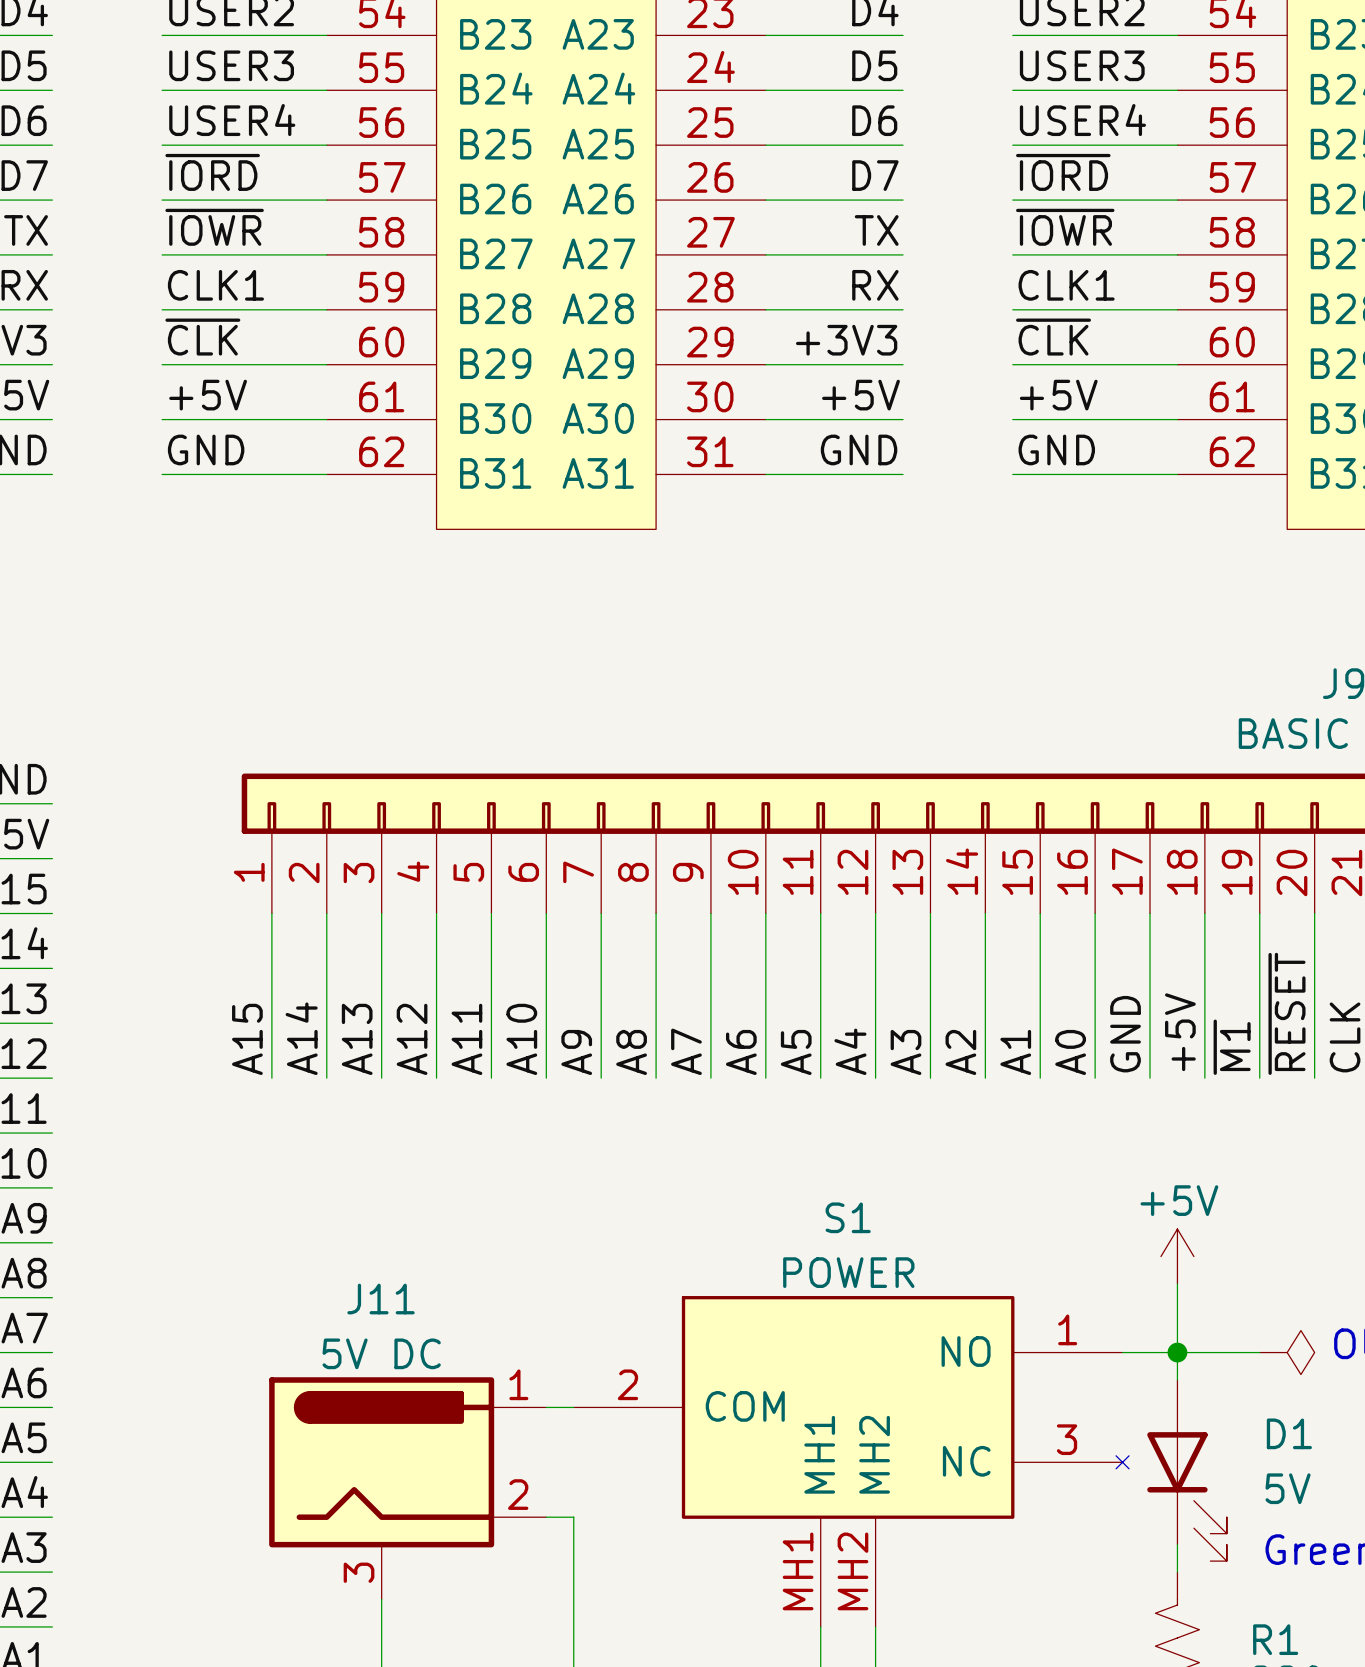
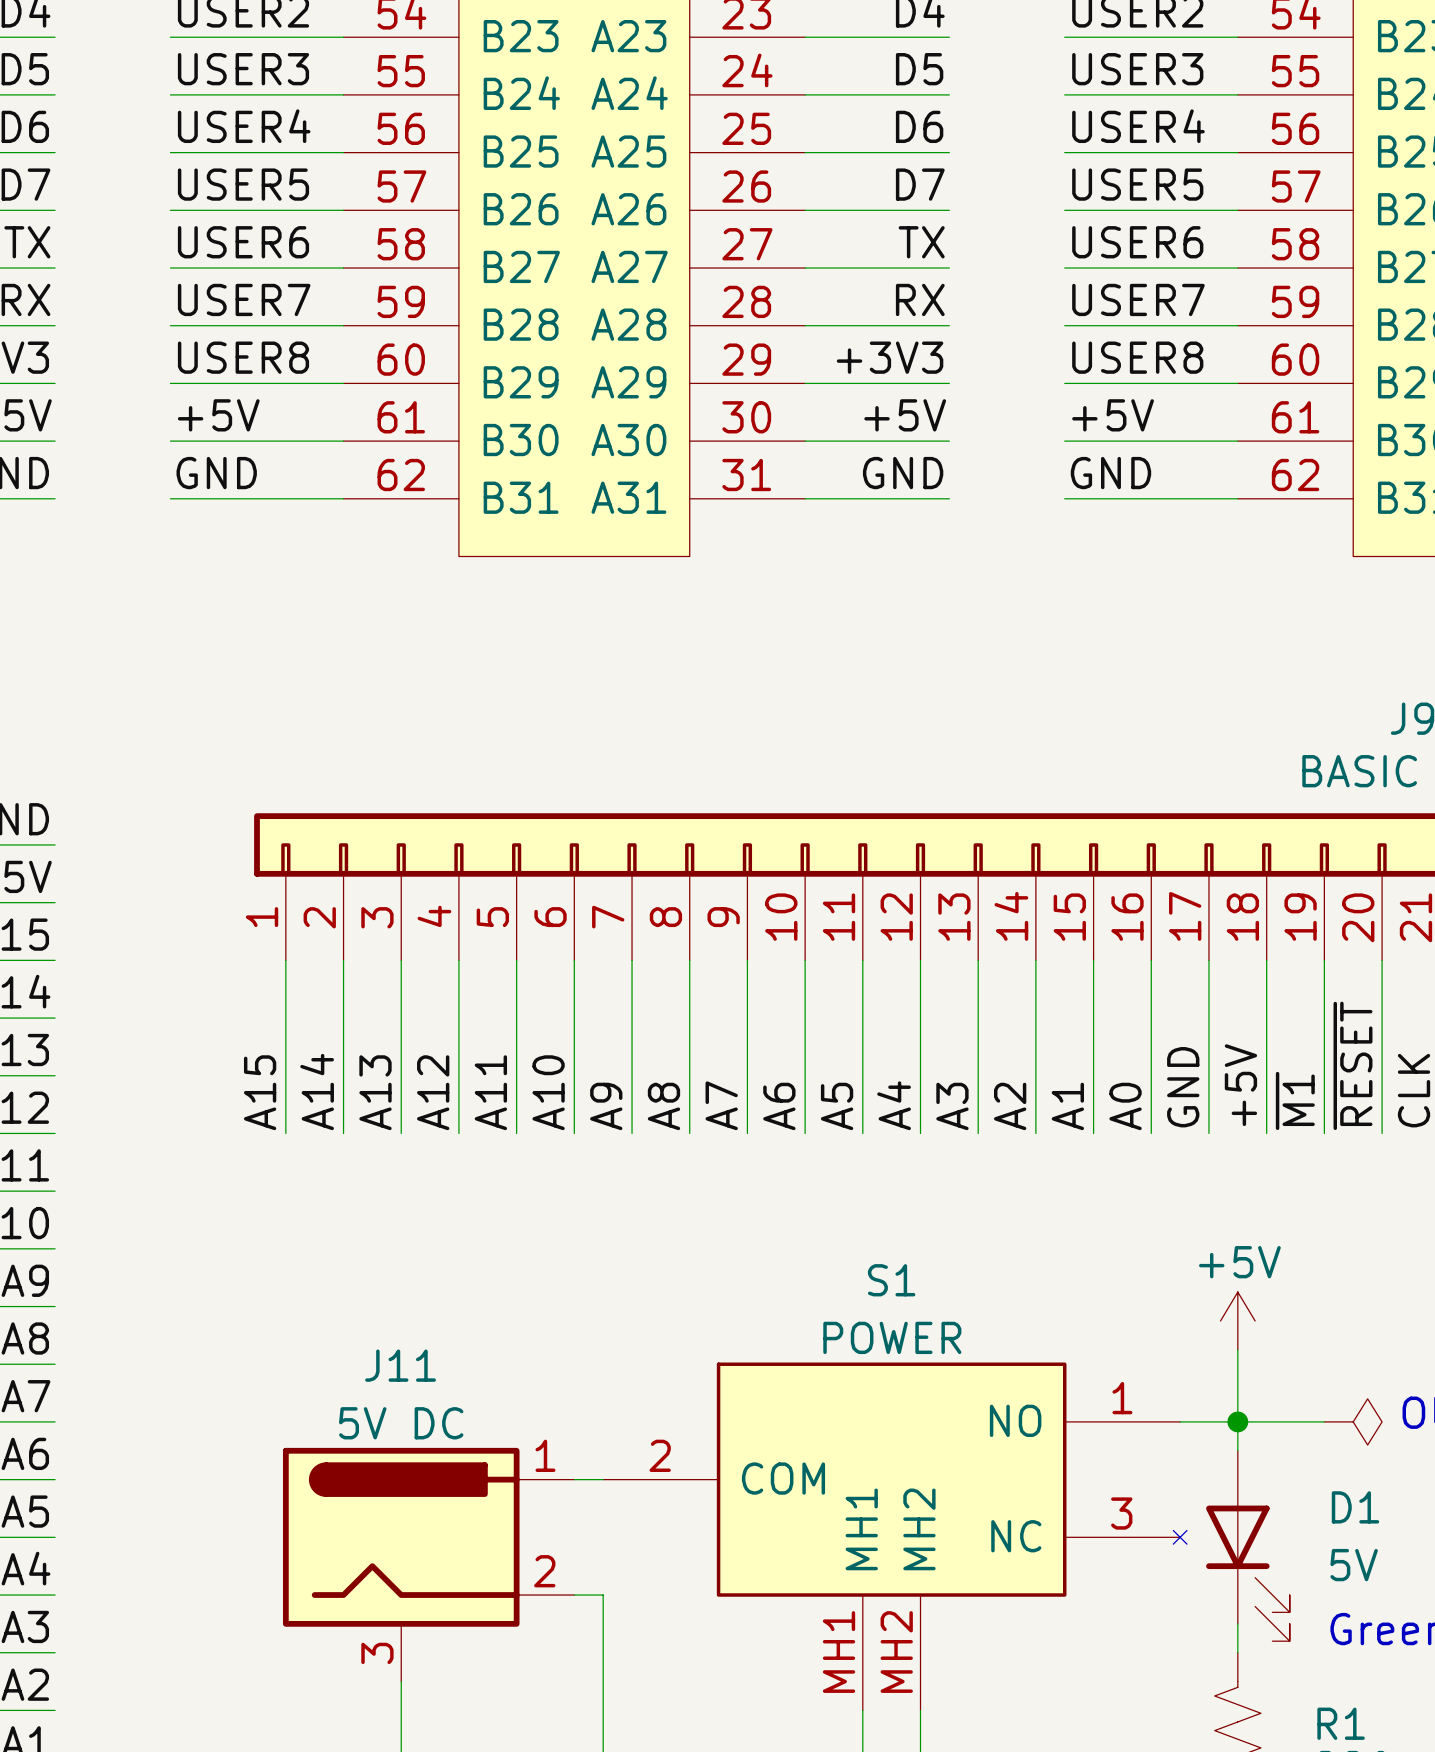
label: ~{IORD} (212, 172) -> USER5 (243, 184)
label: ~{IORD} (1063, 172) -> USER5 (1137, 184)
label: ~{IOWR} (214, 227) -> USER6 (243, 242)
label: ~{IOWR} (1065, 227) -> USER6 (1137, 242)
label: CLK1 (215, 285) -> USER7 (244, 299)
label: CLK1 (1066, 285) -> USER7 (1138, 299)
label: ~{CLK} (202, 337) -> USER8 (243, 357)
label: ~{CLK} (1053, 337) -> USER8 (1137, 357)

